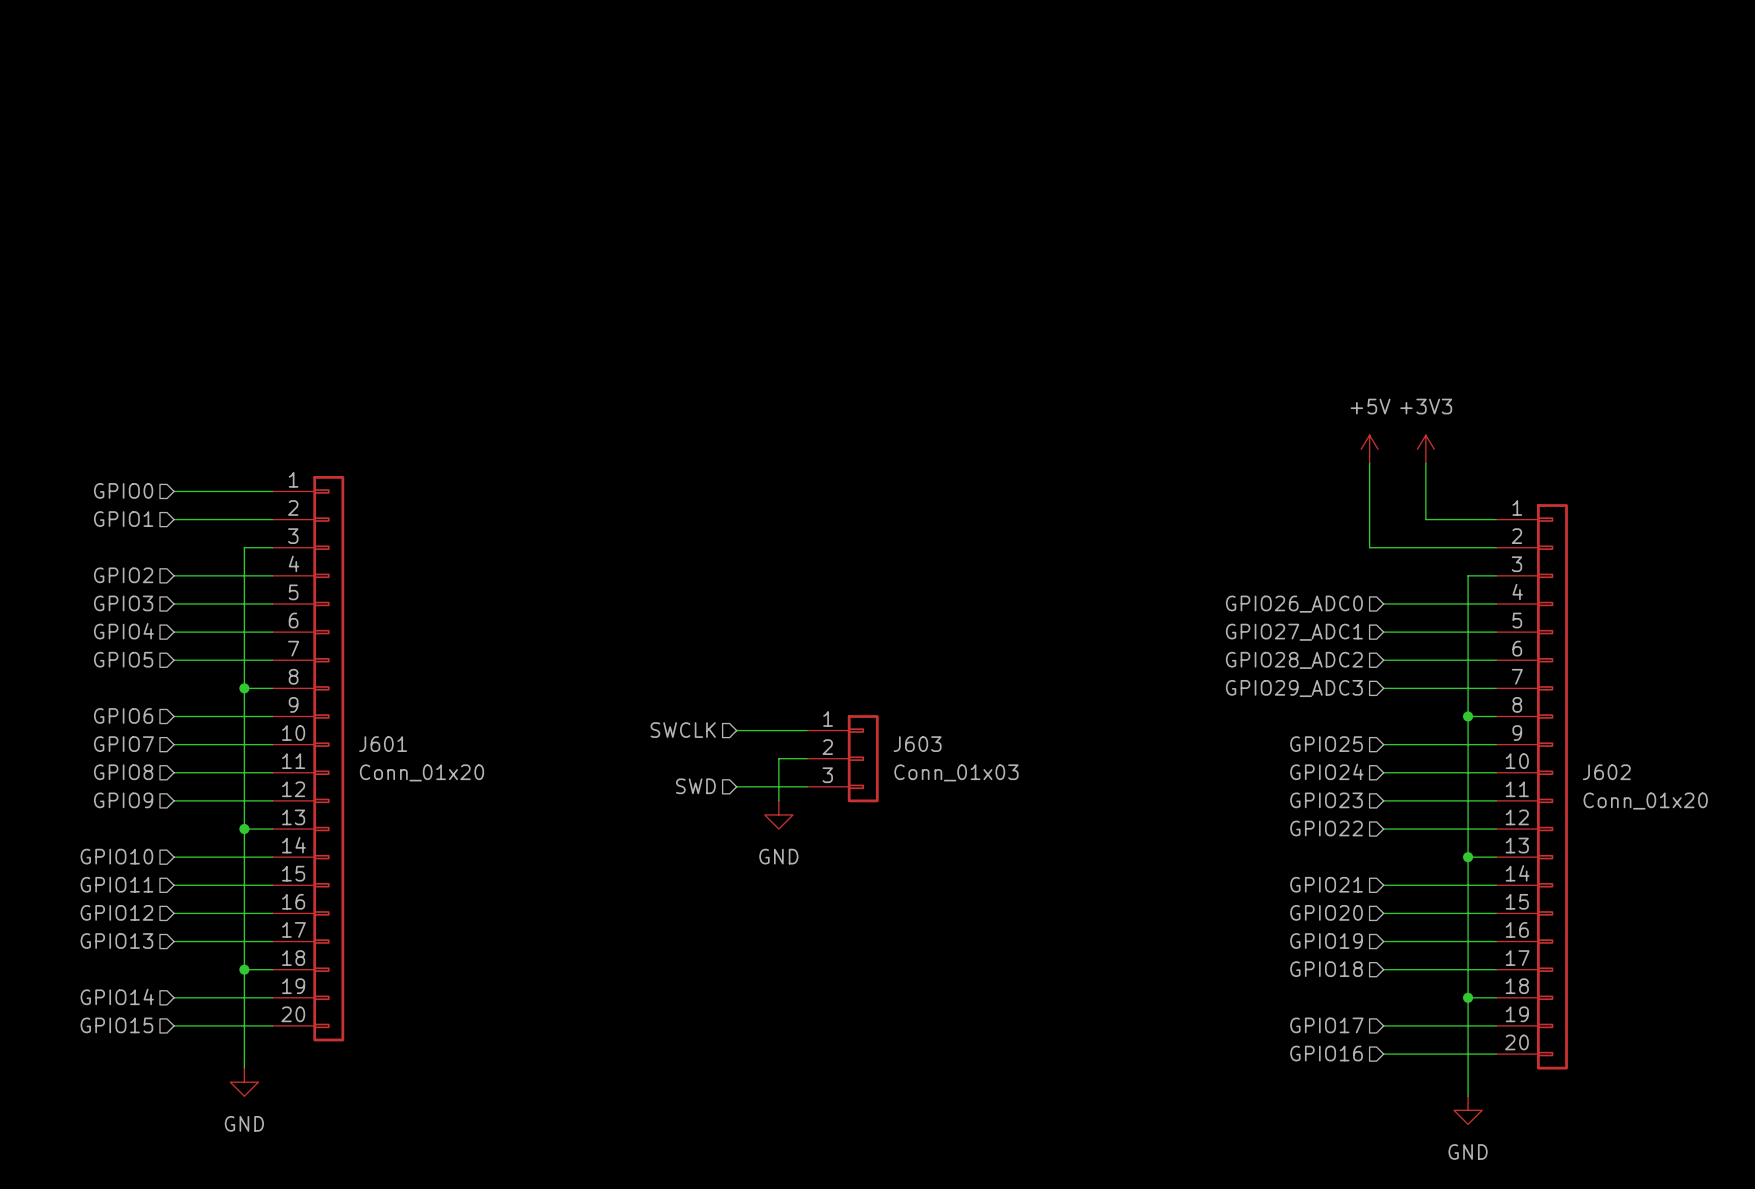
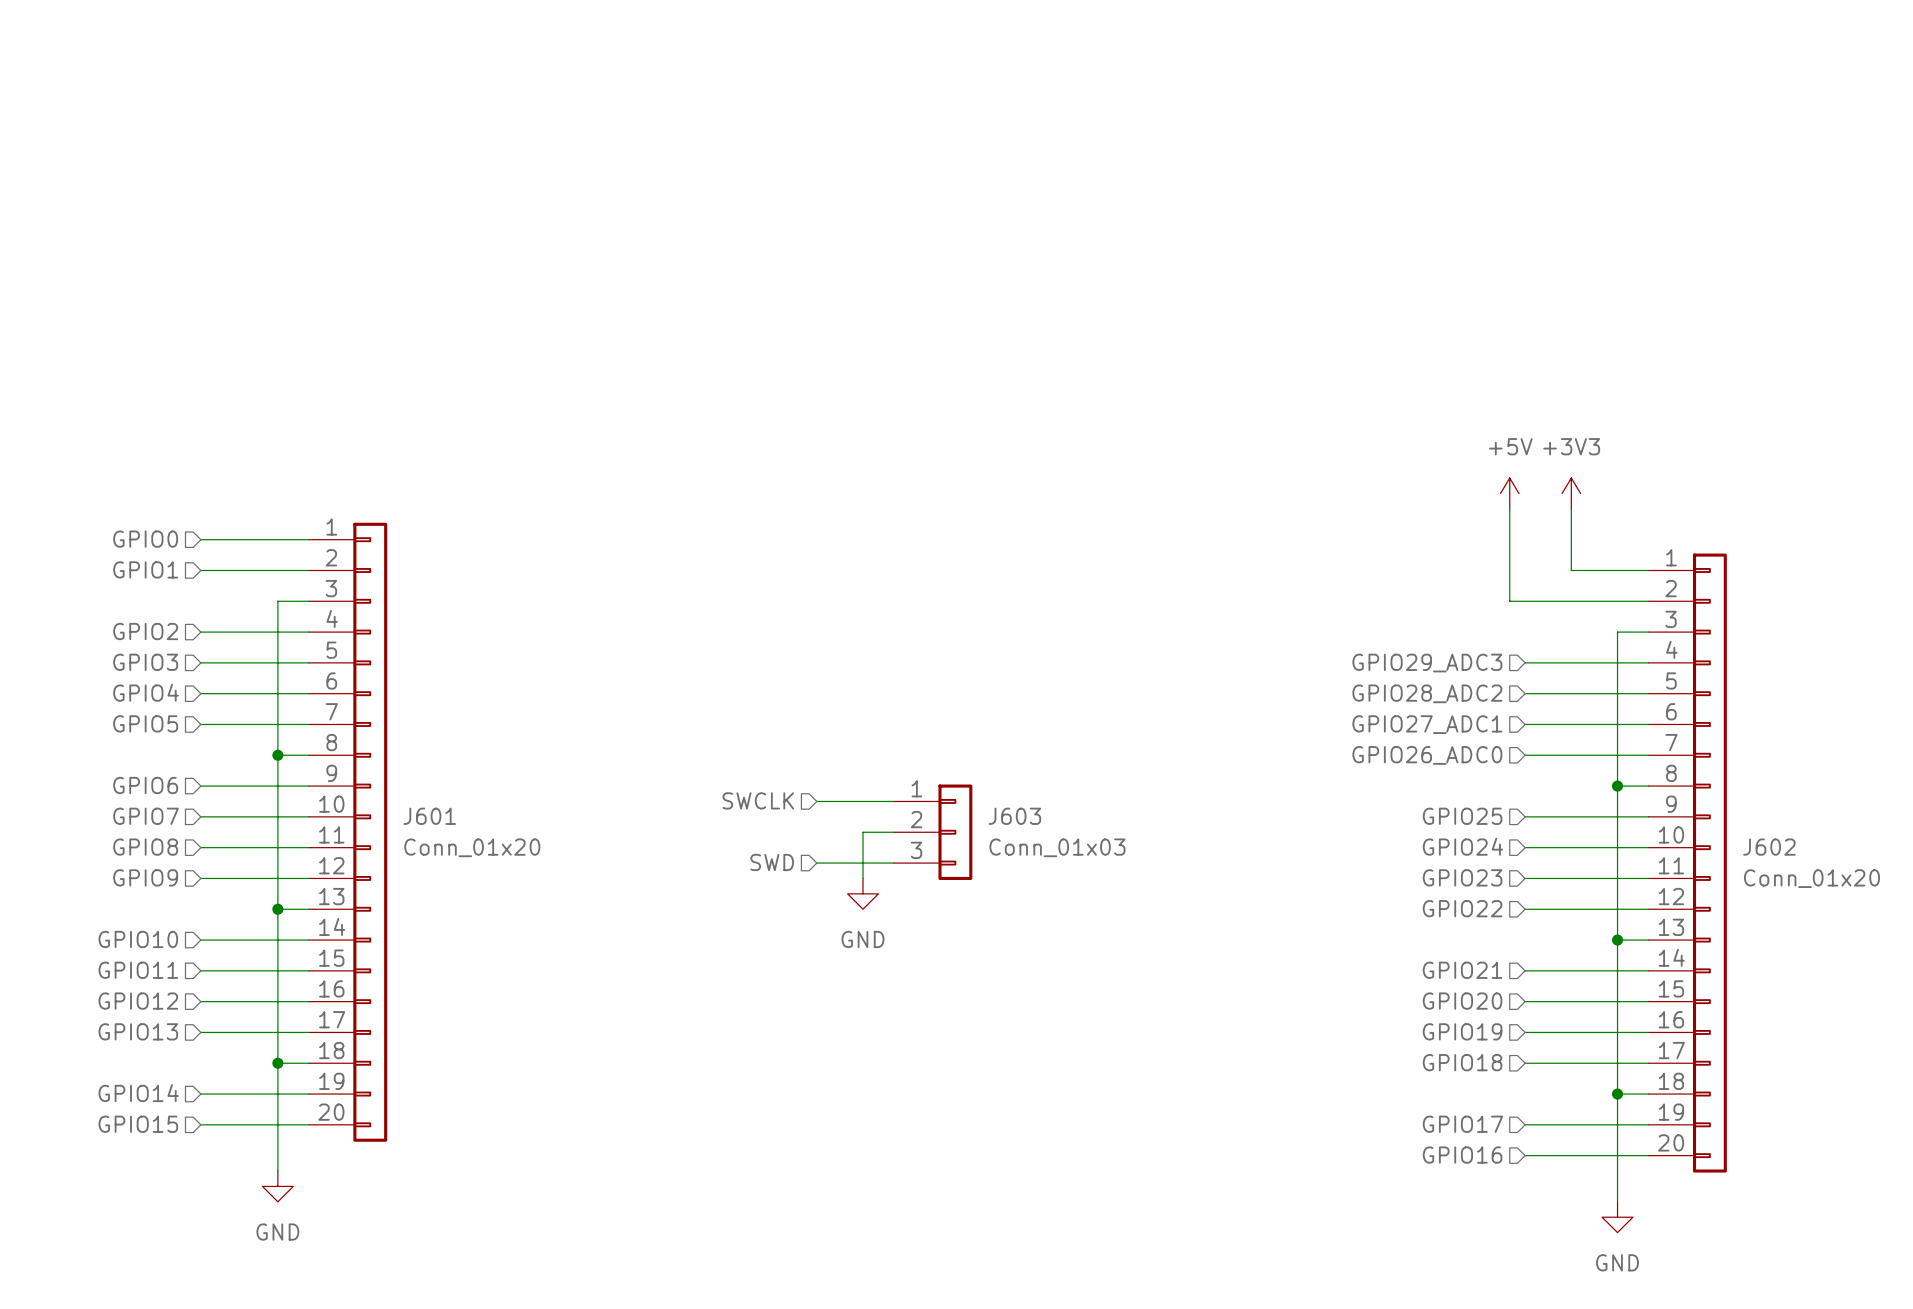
hierarchical label: GPIO26_ADC0 (1294, 604) -> GPIO29_ADC3 (1427, 663)
hierarchical label: GPIO27_ADC1 (1294, 632) -> GPIO28_ADC2 (1427, 693)
hierarchical label: GPIO28_ADC2 (1294, 660) -> GPIO27_ADC1 (1427, 724)
hierarchical label: GPIO29_ADC3 (1294, 688) -> GPIO26_ADC0 (1427, 755)

